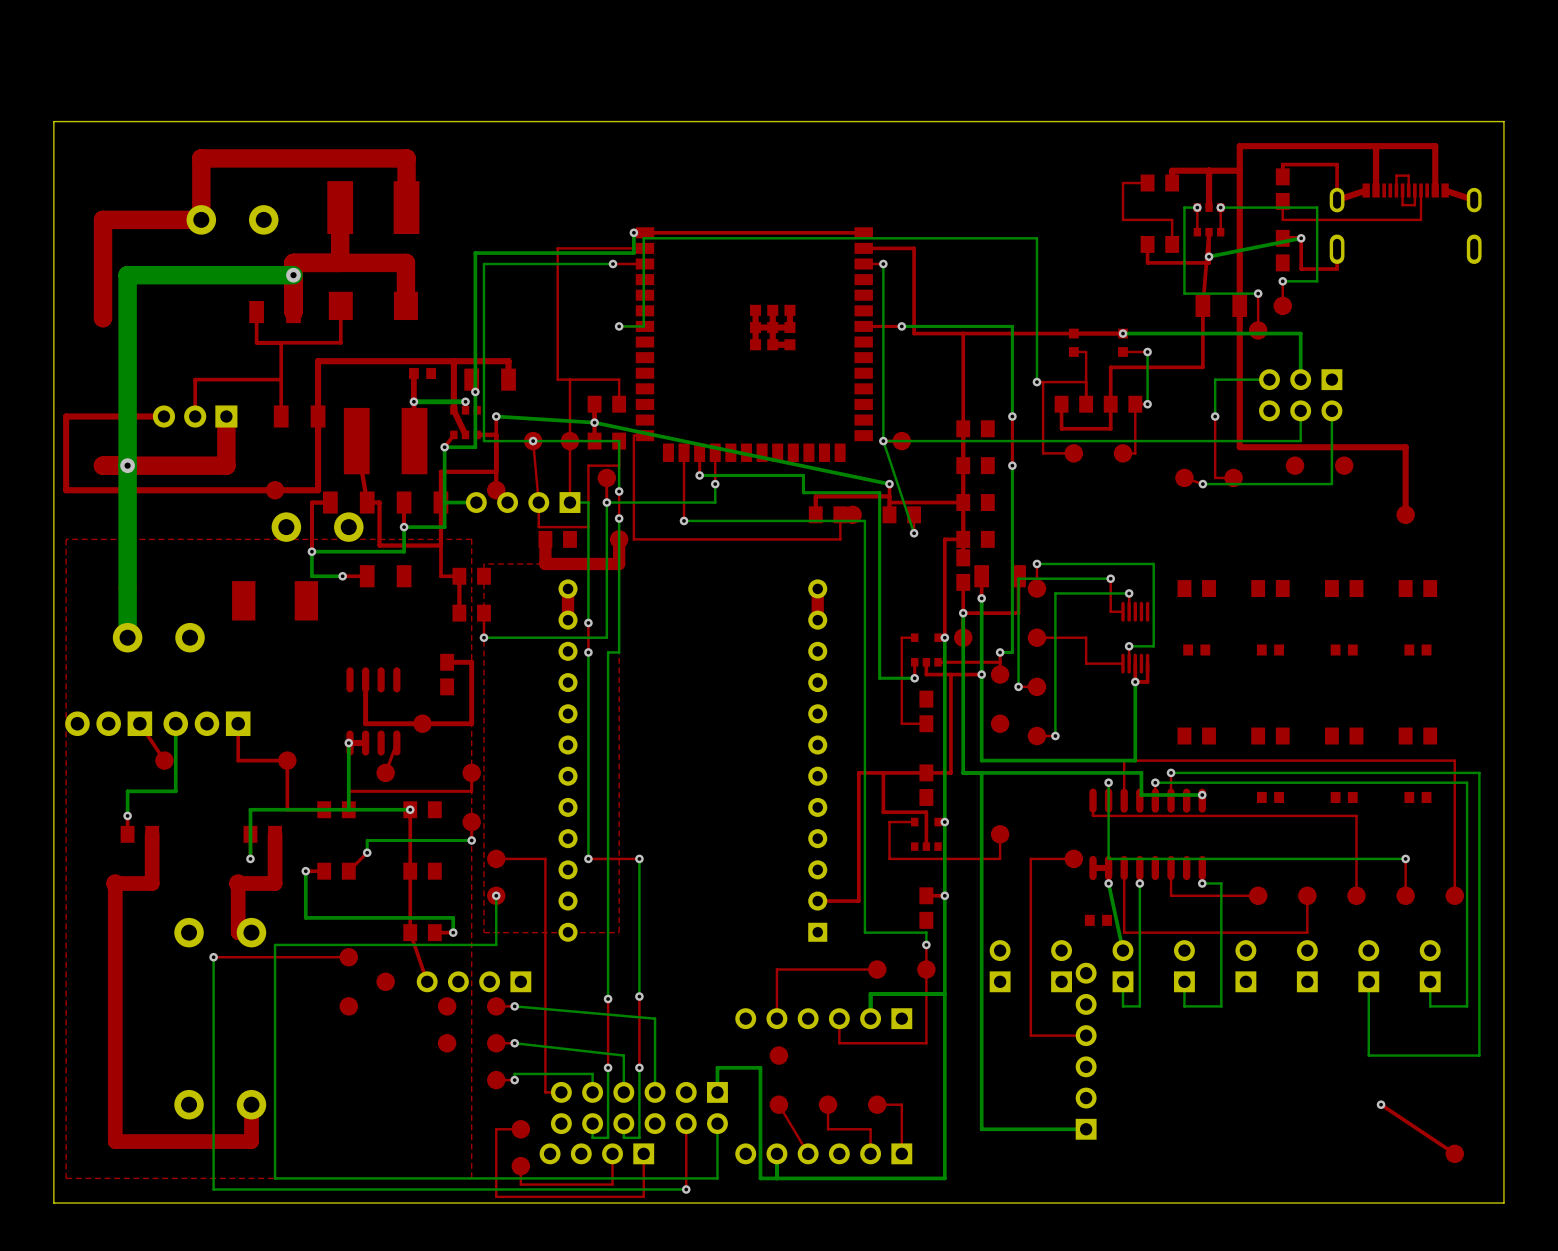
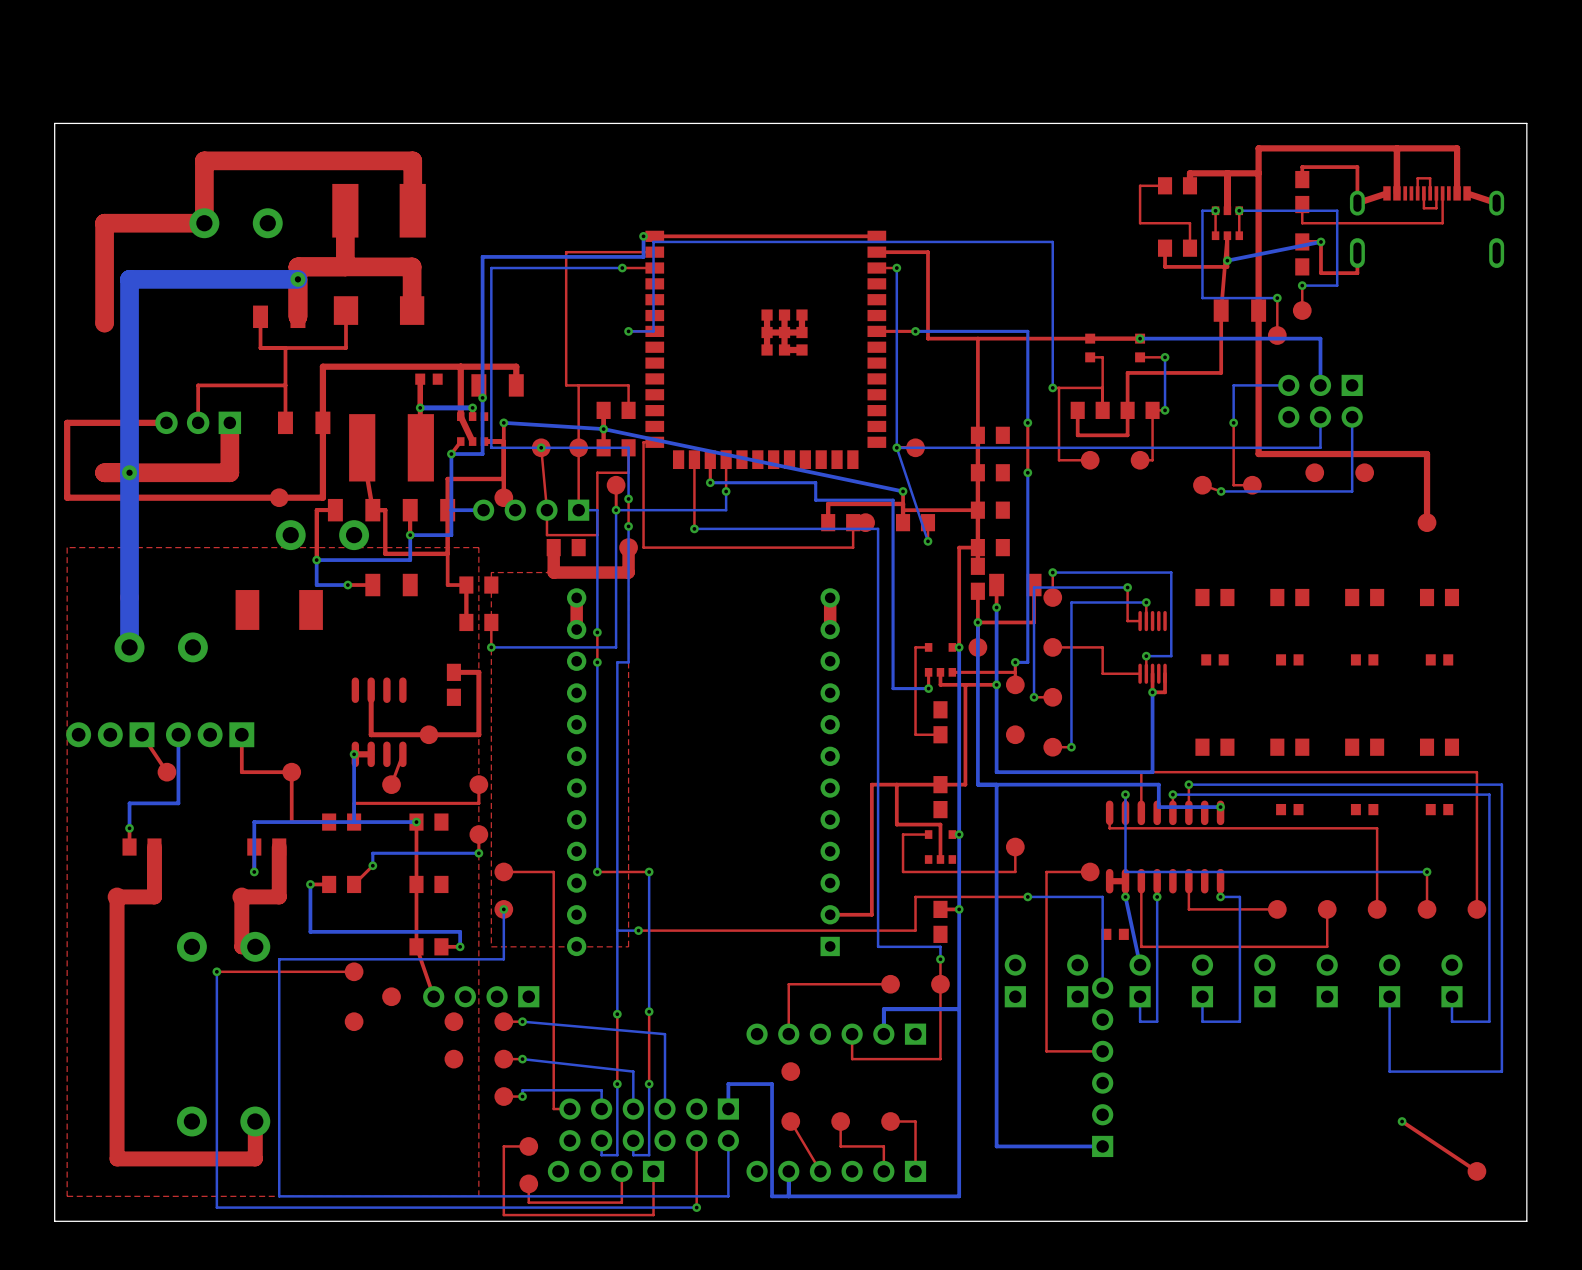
top track: none -> (1027, 896) (915, 896) (915, 930) (638, 930)
bottom track: none -> (1027, 896) (1102, 896) (1102, 988)
via: none -> (1027, 896)
bottom track: none -> (638, 930) (617, 930)
via: none -> (638, 930)

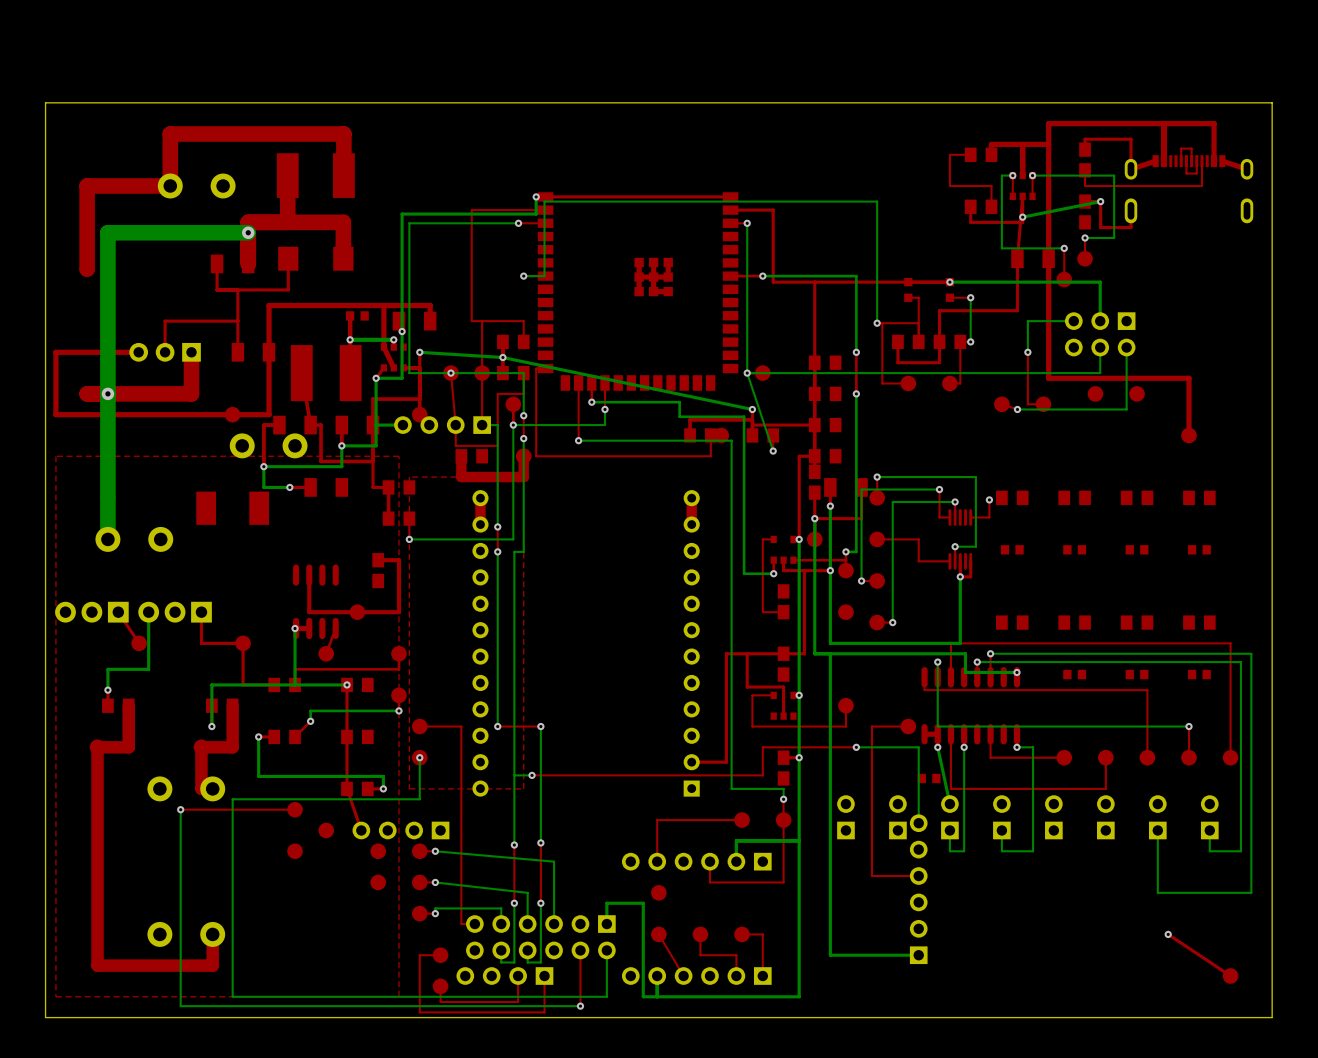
top track: none -> (989, 499) (989, 517) (970, 517)
via: none -> (989, 499)

